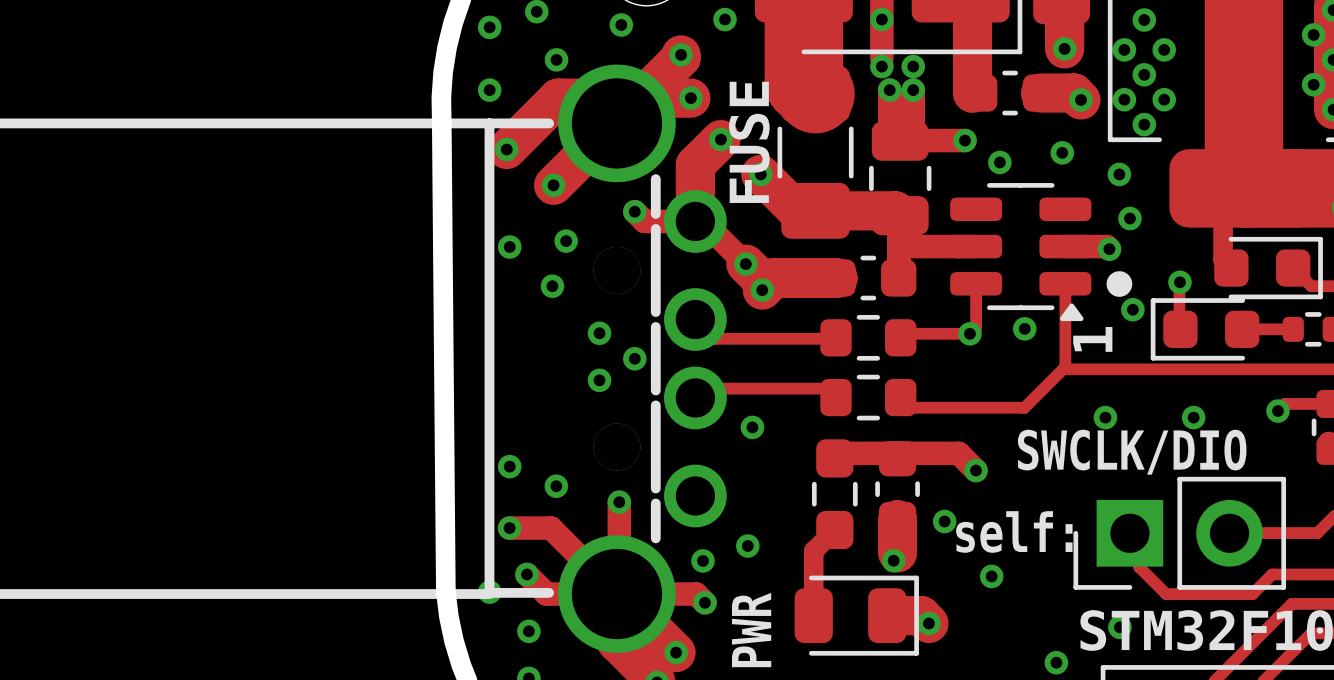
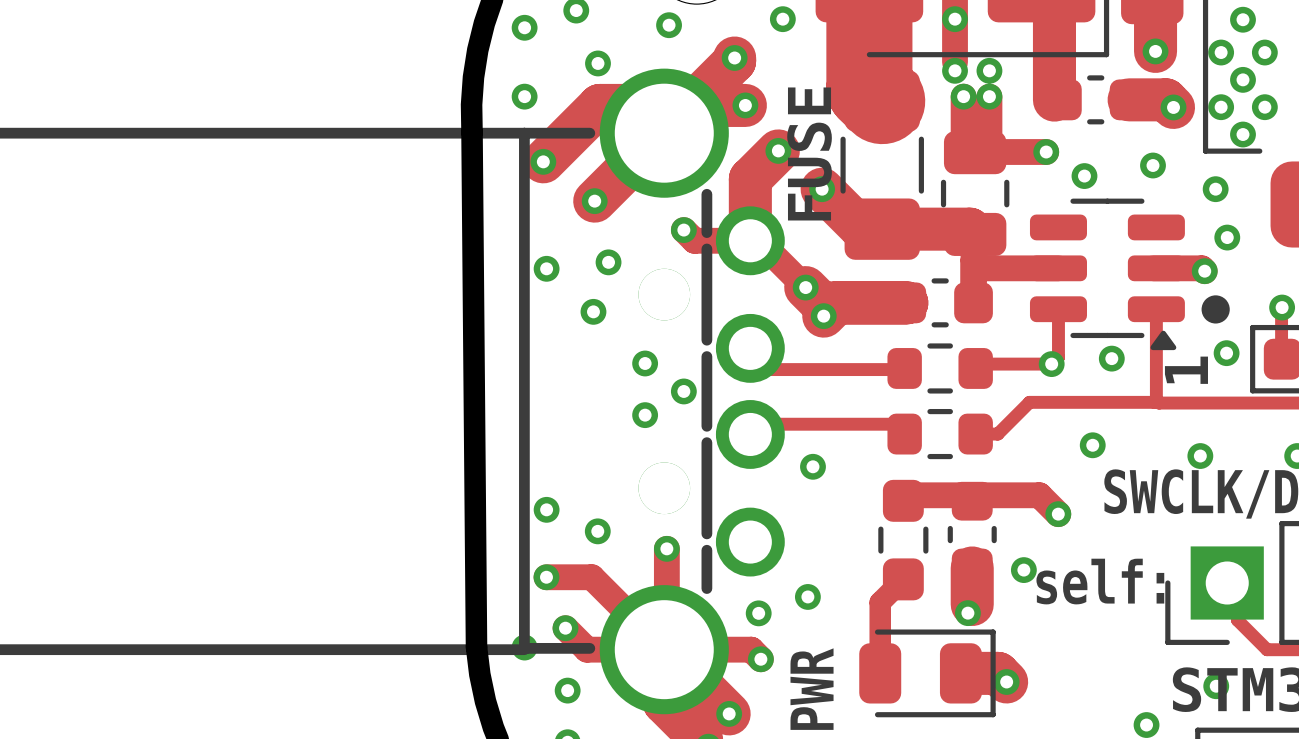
via position: (1132, 309) -> (1226, 353)
track: (1063, 368) (1024, 407) (910, 407) (900, 397) -> (1154, 402) (1029, 402) (997, 434) (975, 434)
via: none -> (1092, 445)
via: (991, 576) -> none

